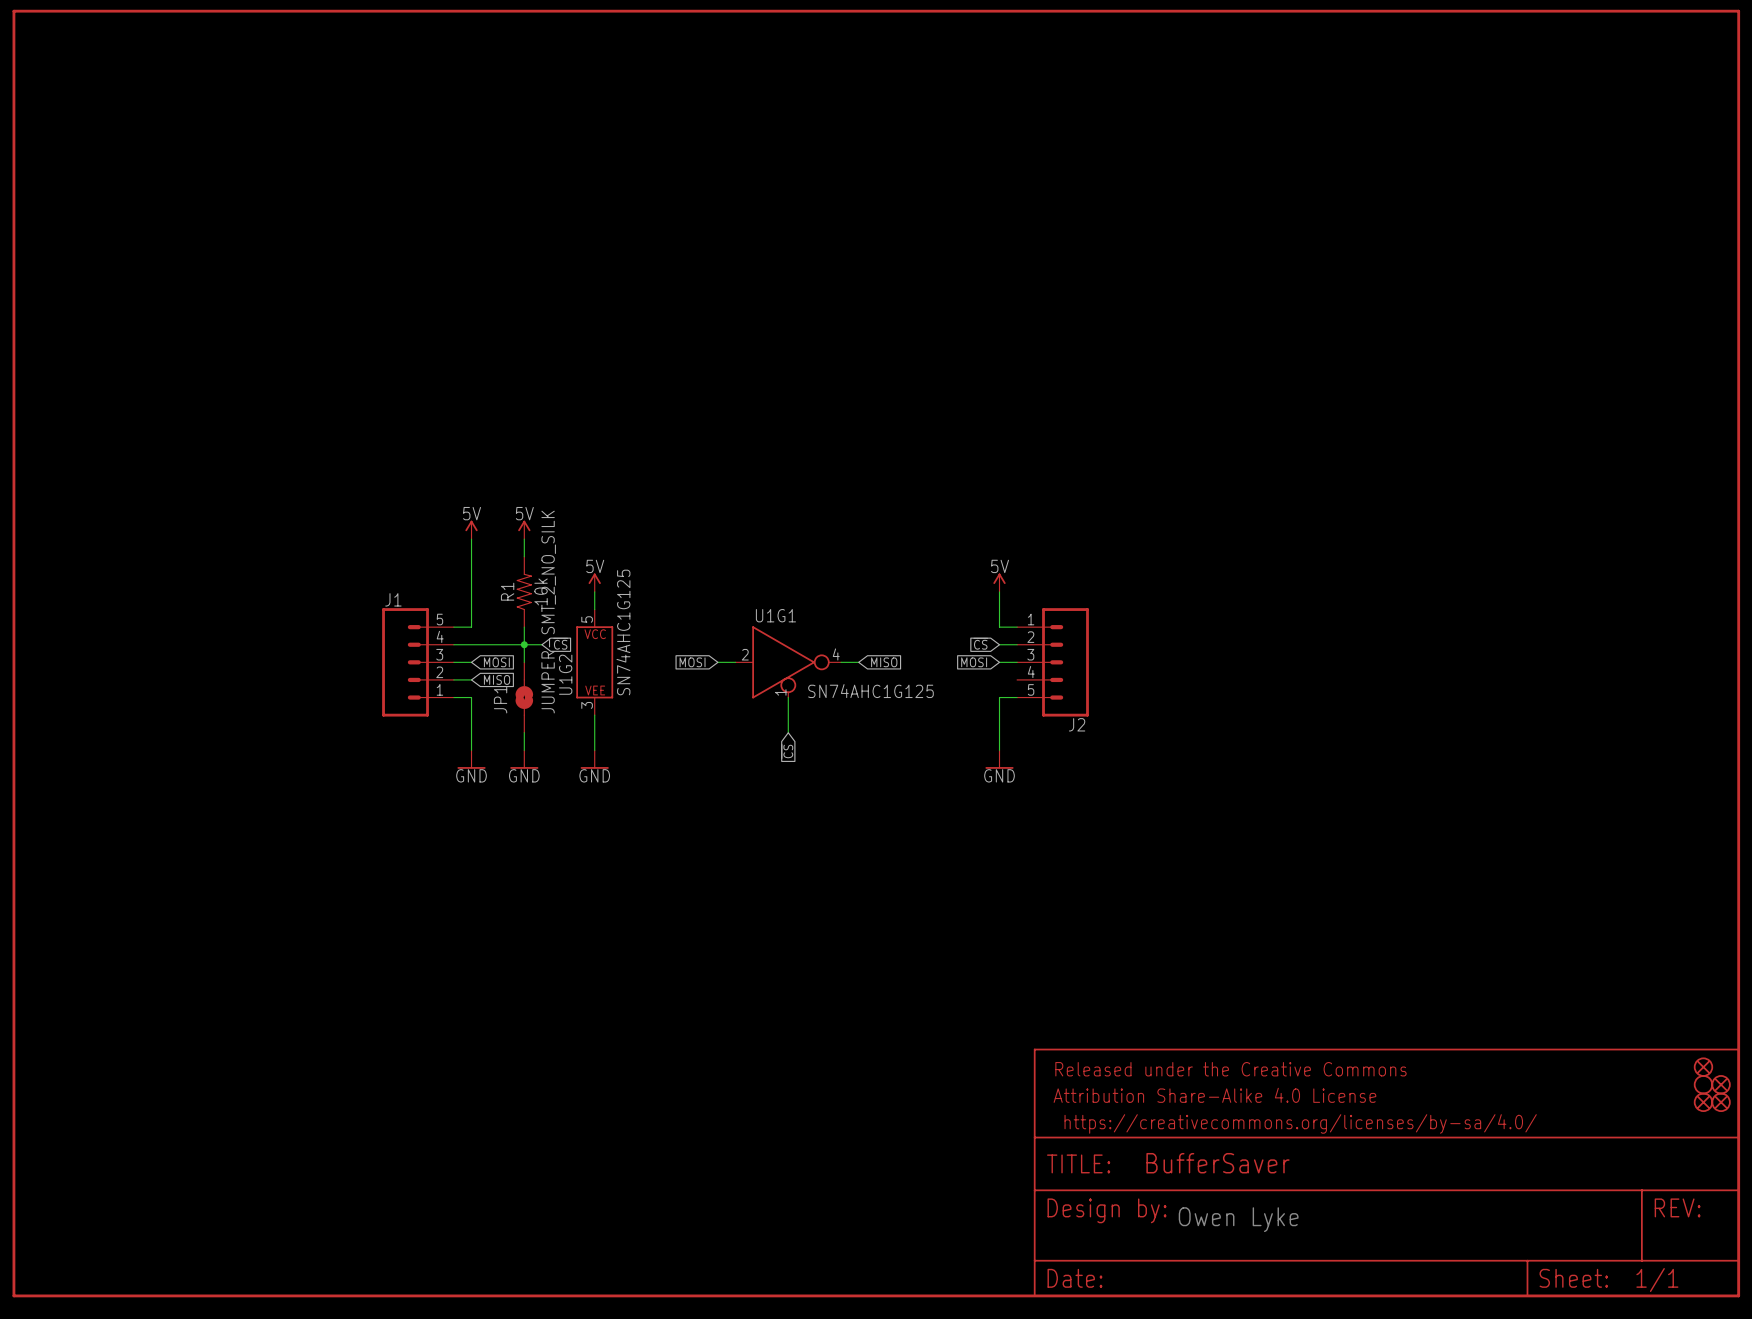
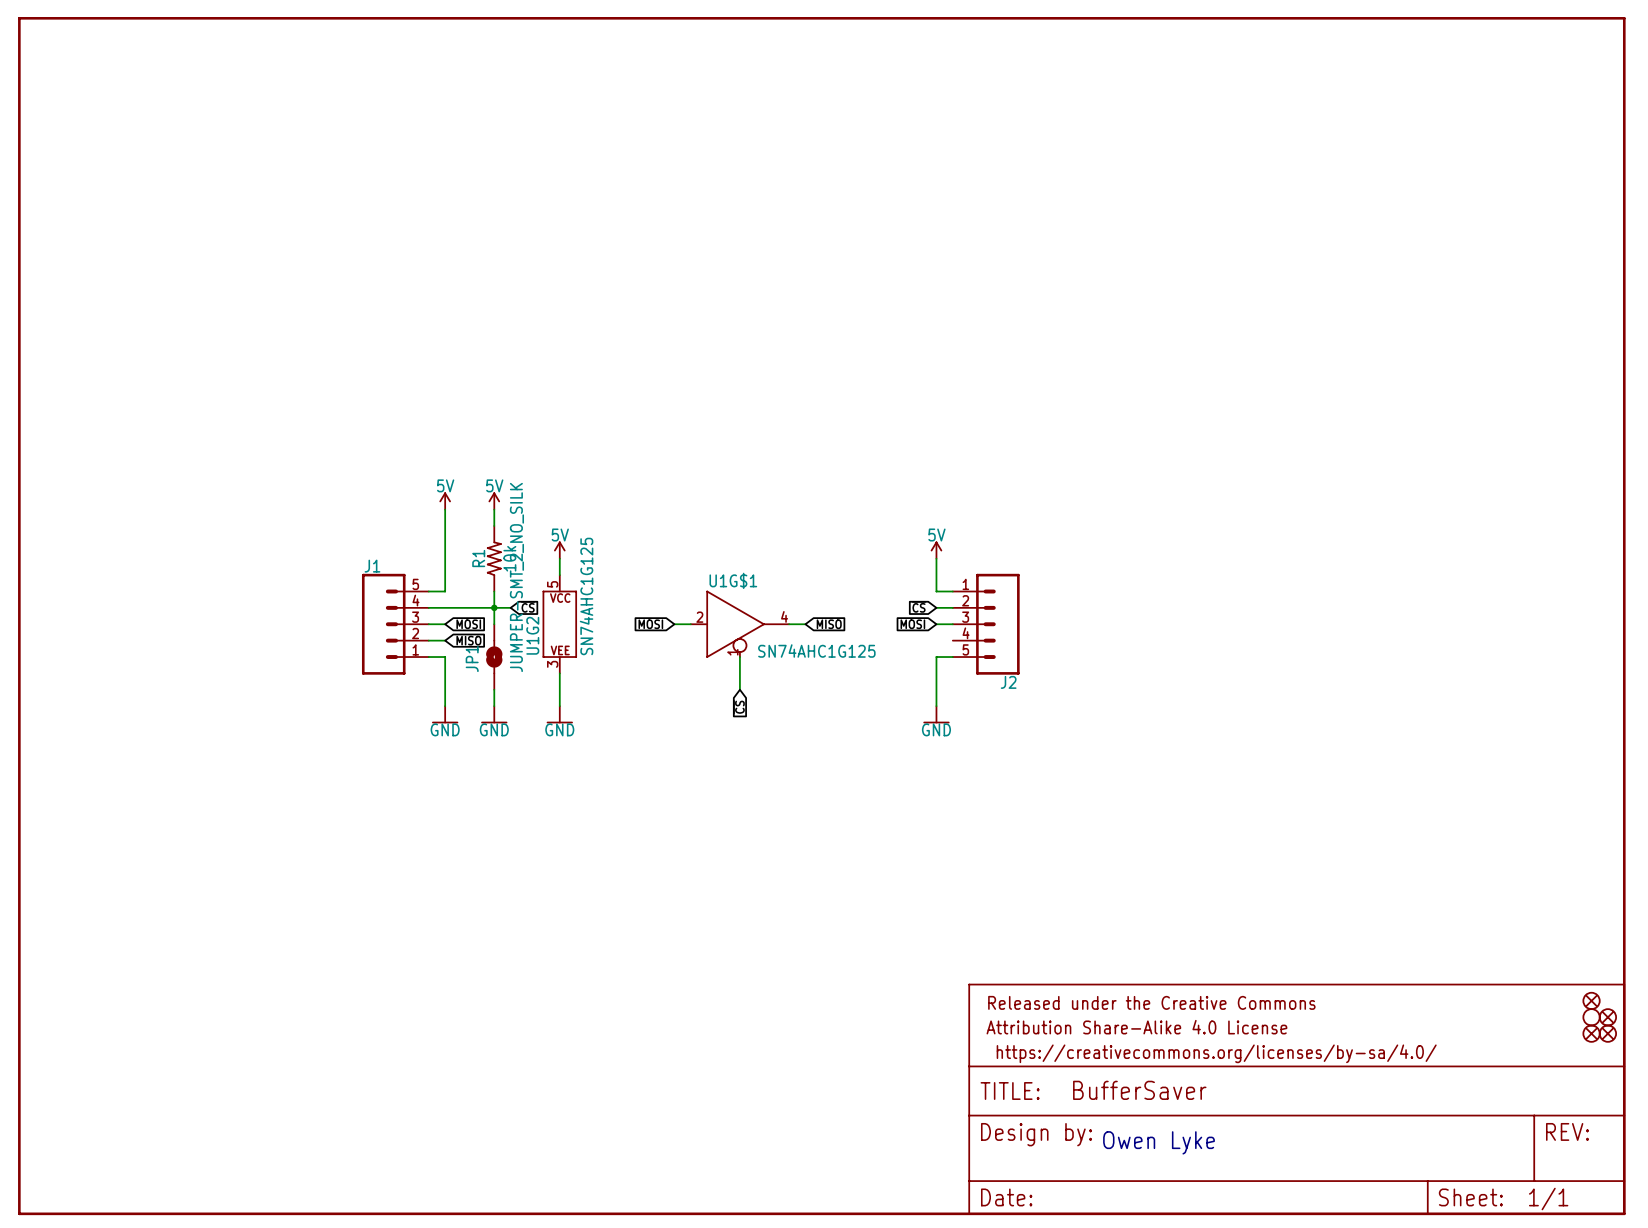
U1G1: SN74AHC1G125 (788, 662) -> none
U1G$1: none -> SN74AHC1G125 (740, 624)

